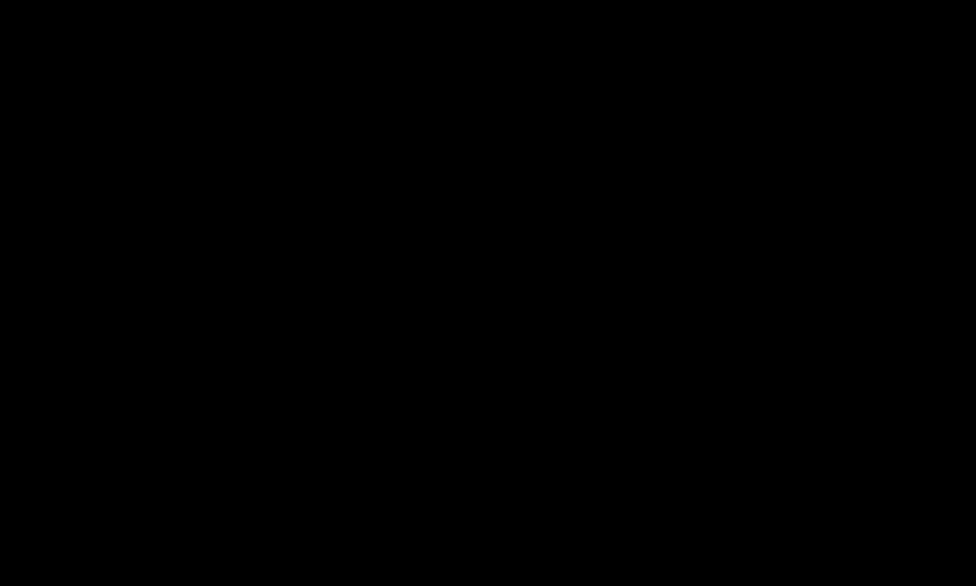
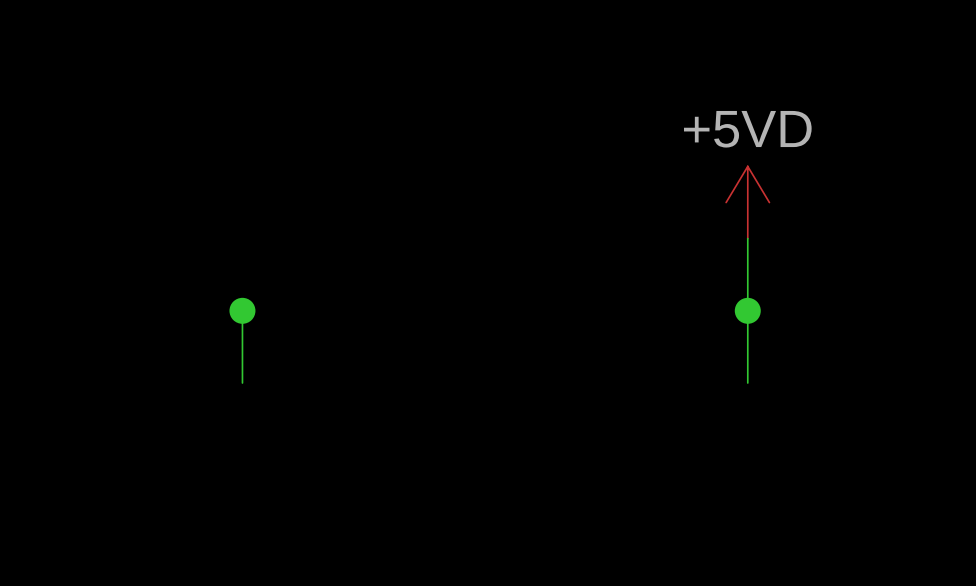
power symbol: none -> +5VD (747, 202)
wire: none -> (747, 238) (747, 383)
wire: none -> (242, 310) (242, 383)
junction: none -> (242, 310)
junction: none -> (747, 310)

